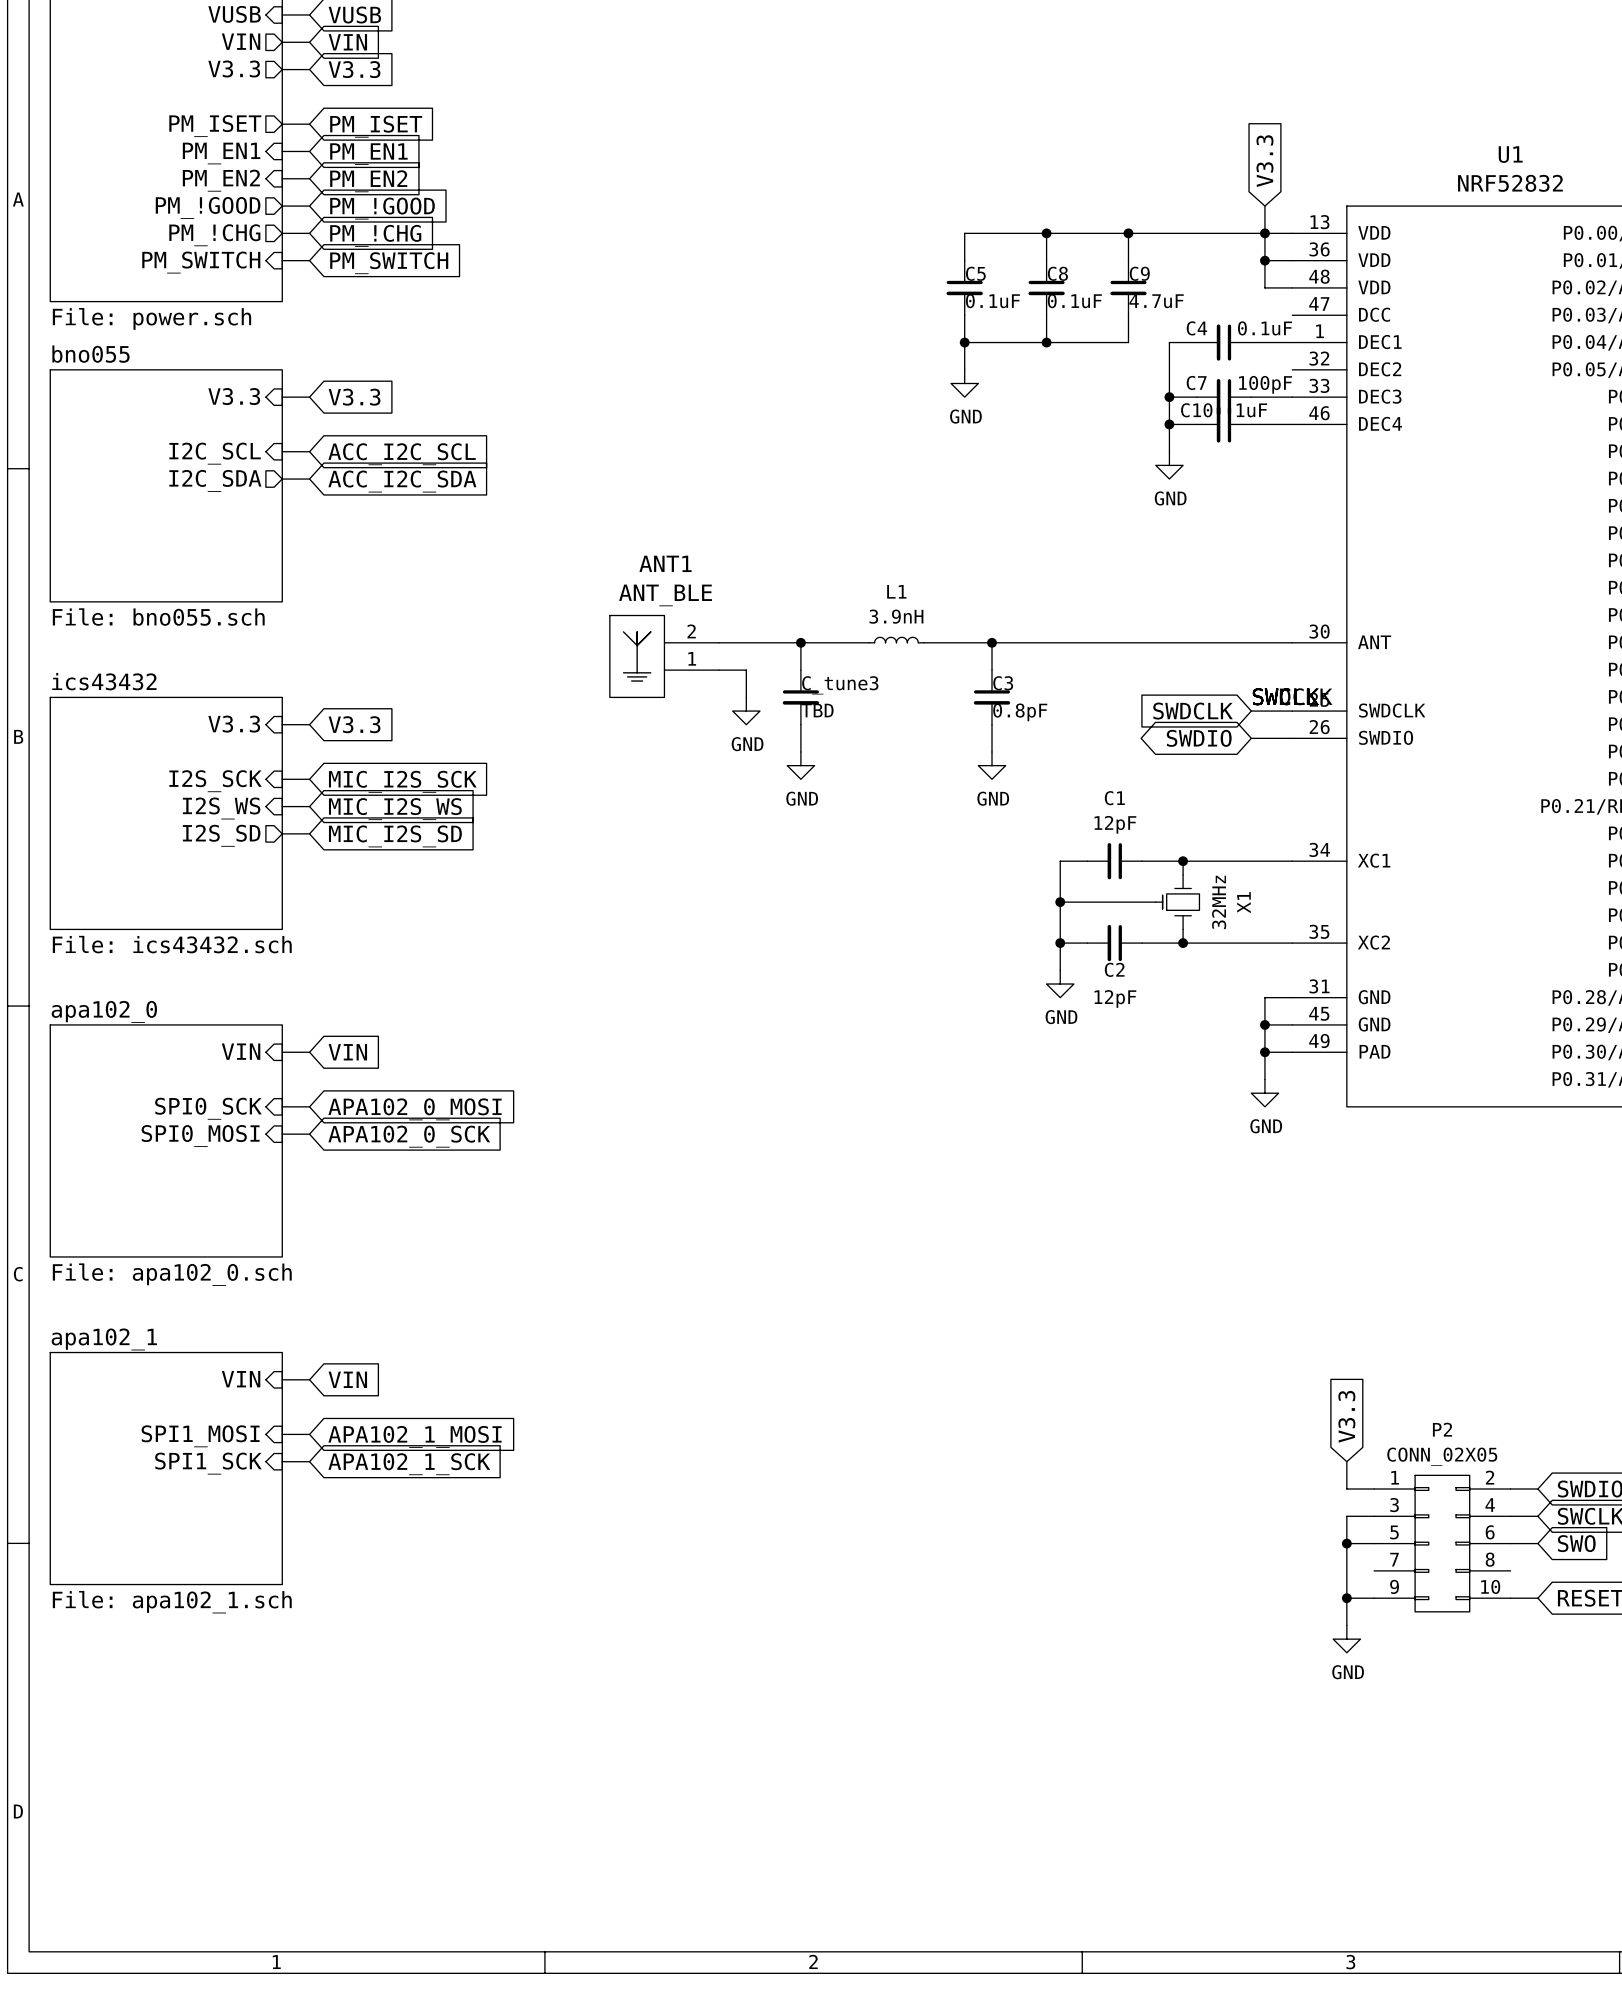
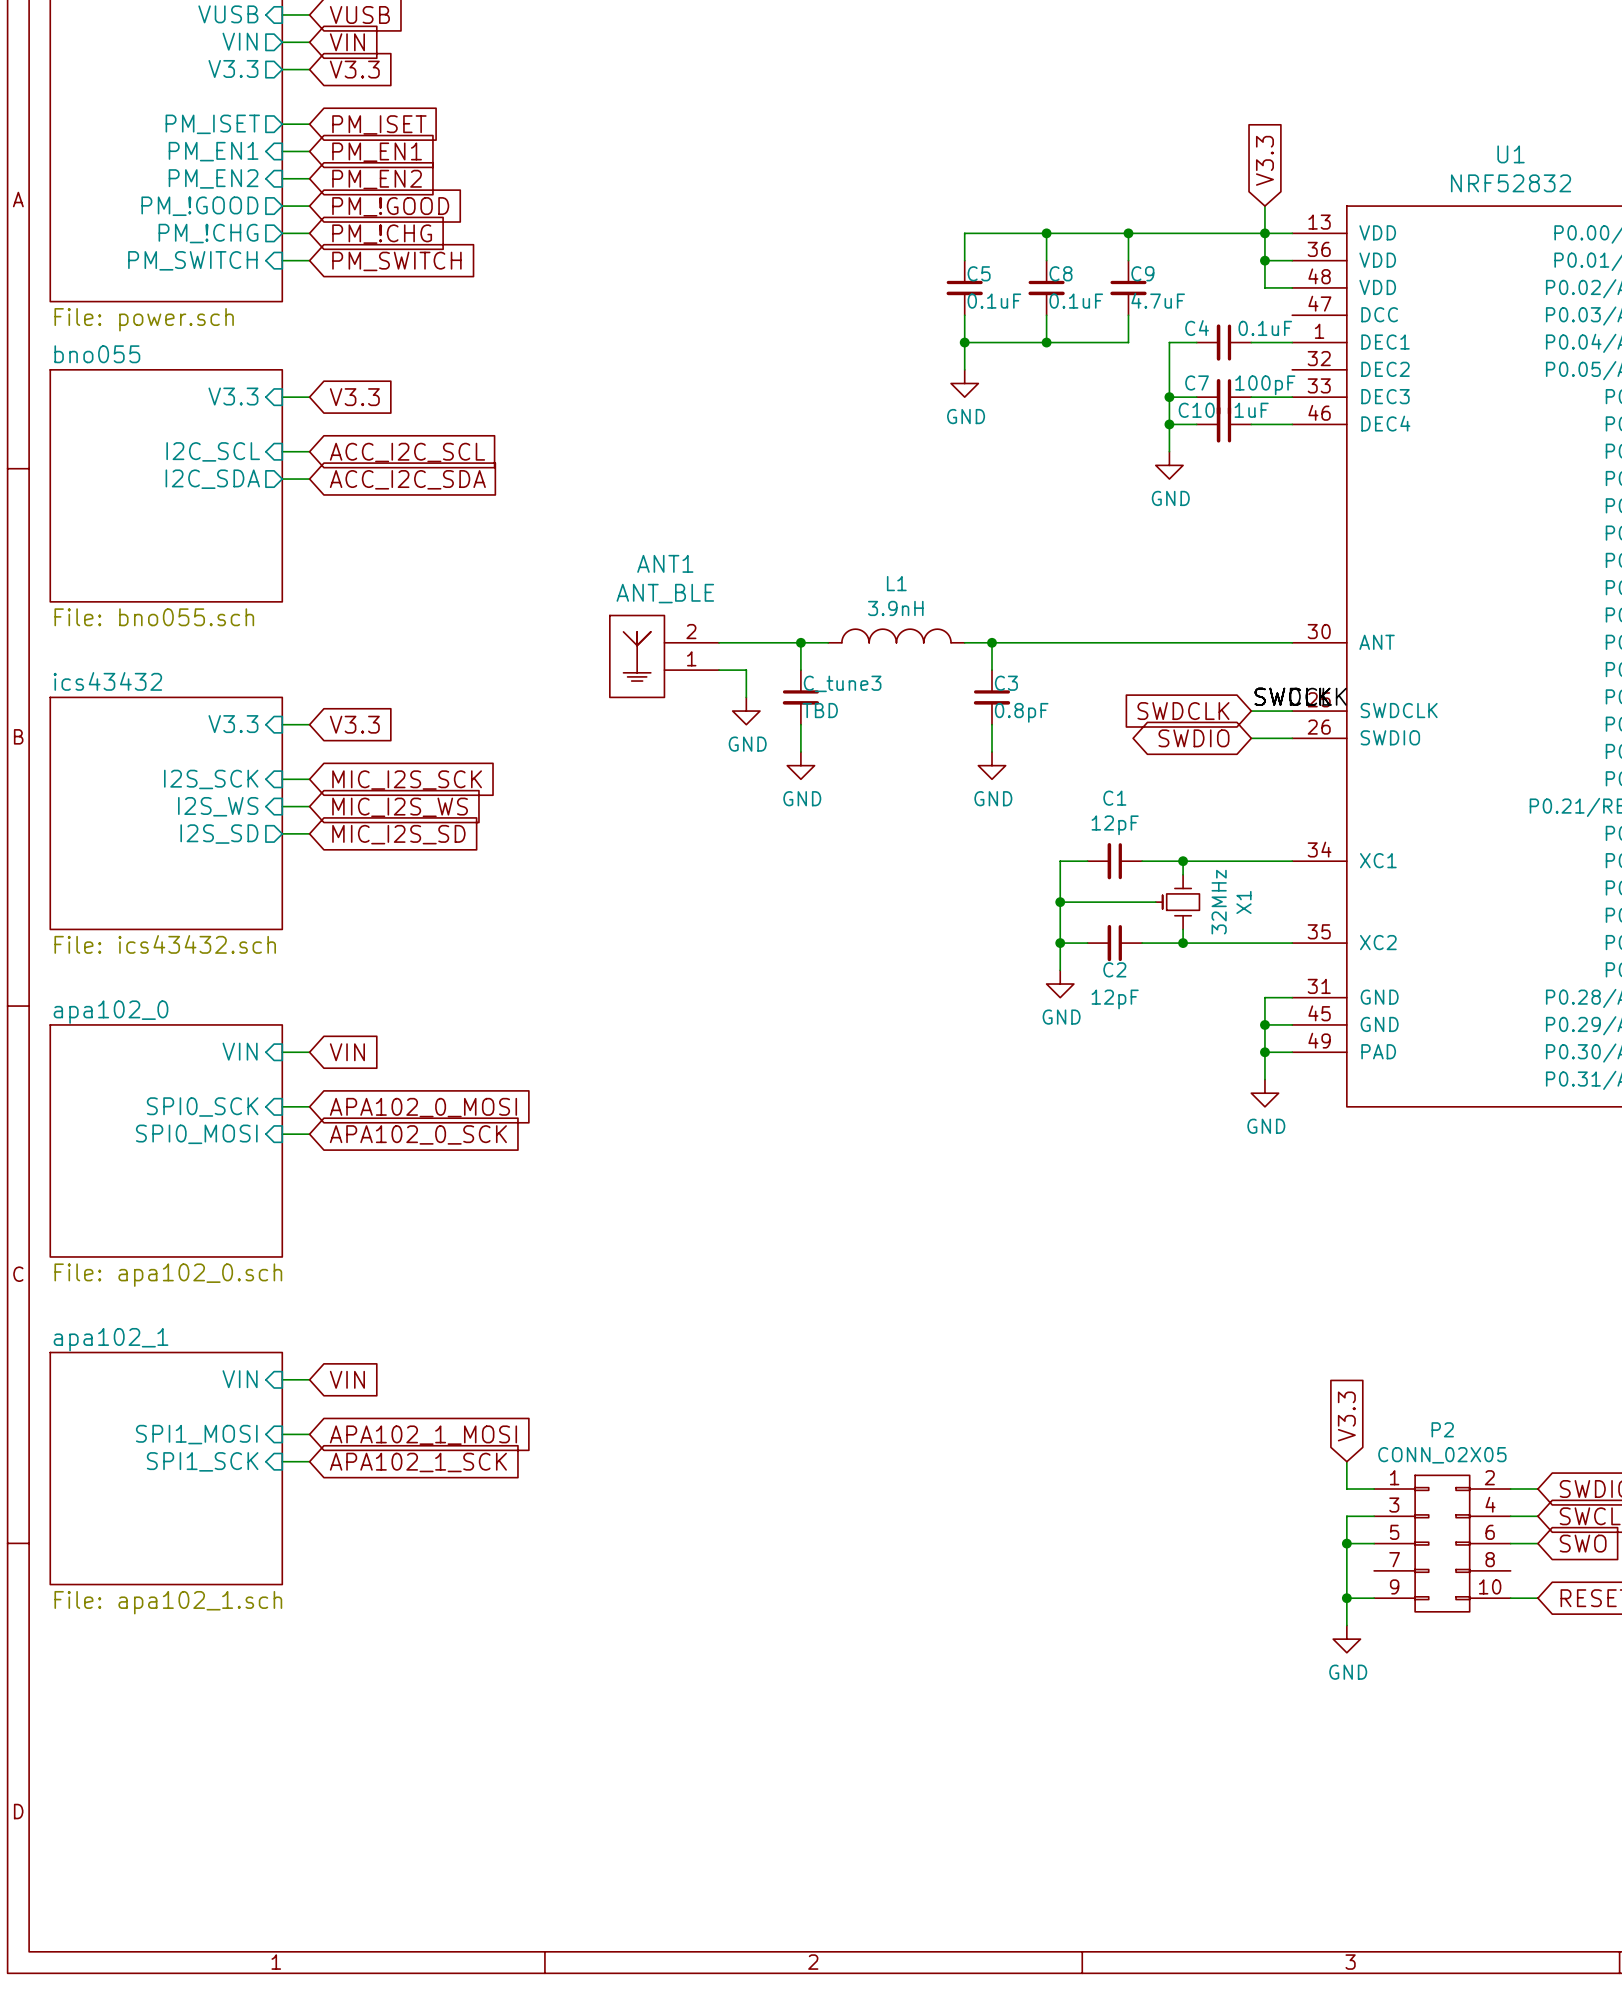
L1 symbol: [869, 637, 924, 643] -> [828, 629, 965, 643]
wire: (828, 642) (869, 642) -> none
wire: (923, 642) (964, 642) -> none

